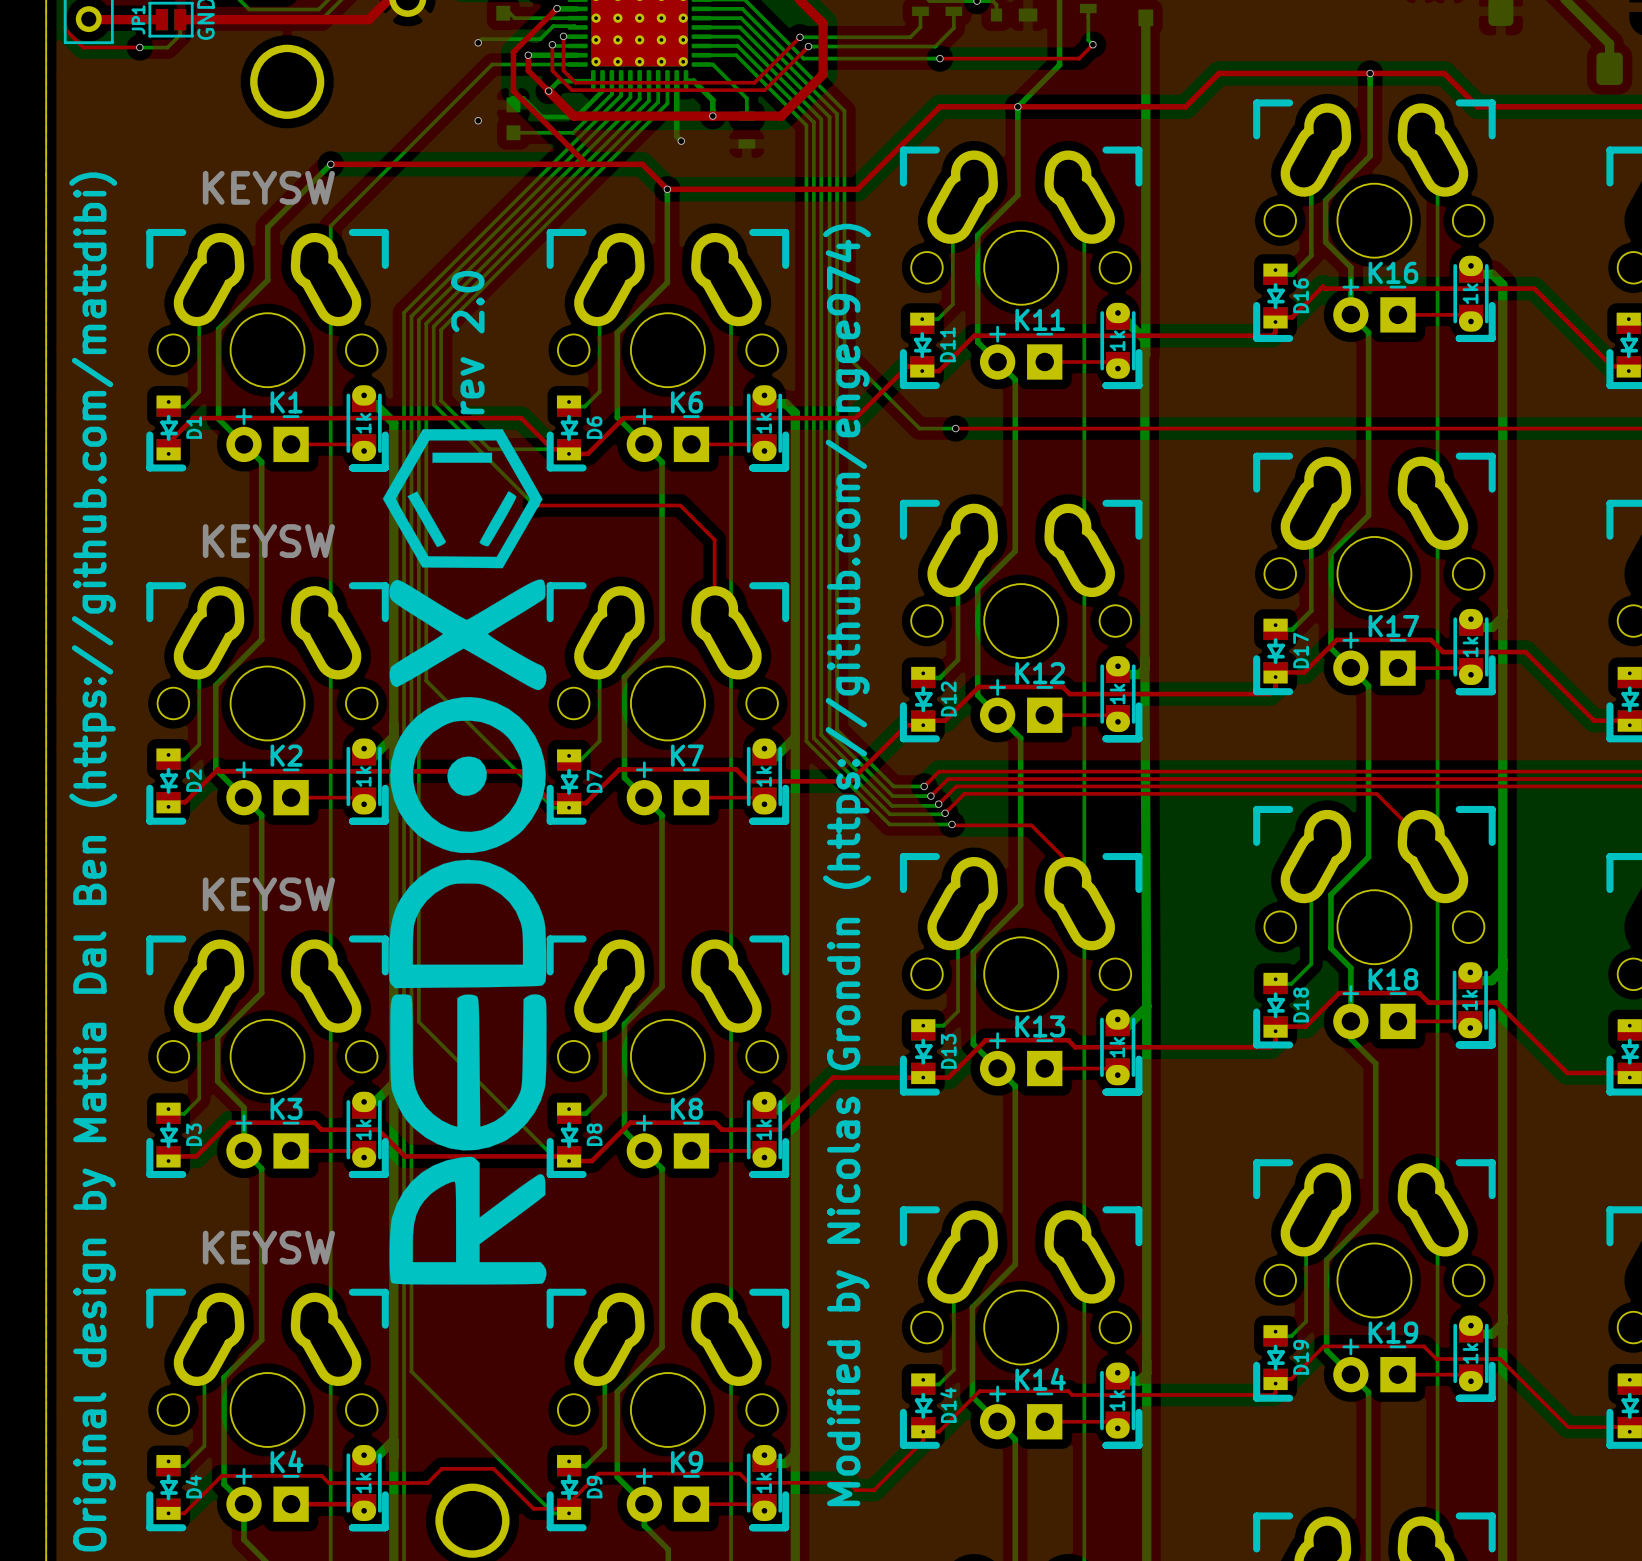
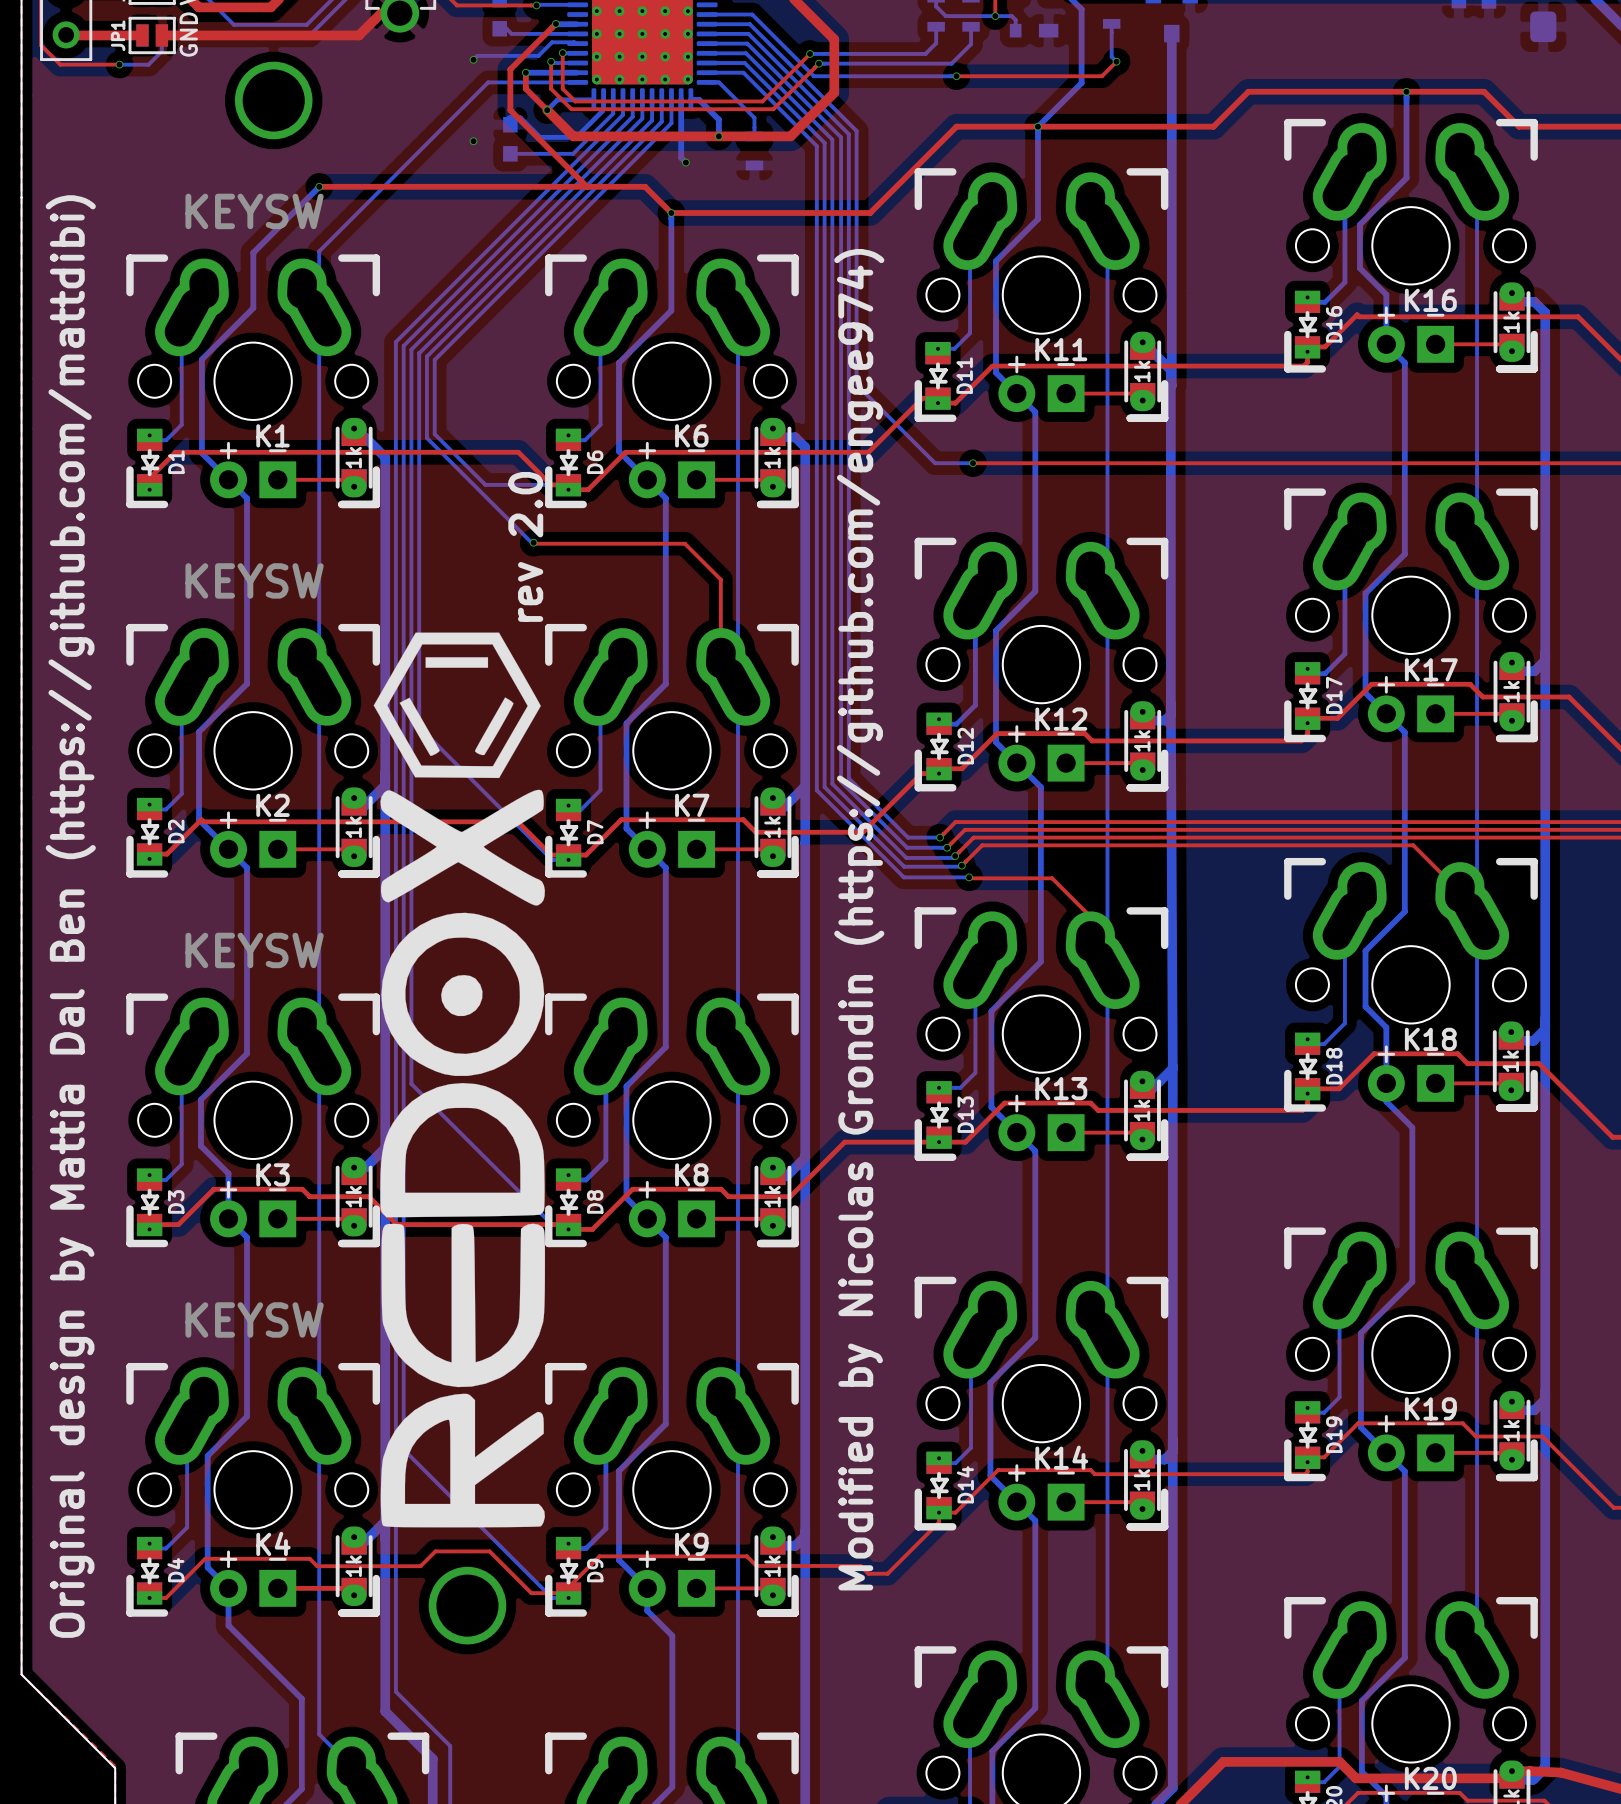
text position: rev 2.0 (467, 342) -> rev 2.0 (525, 546)
drawing position: (464, 856) -> (459, 1080)

